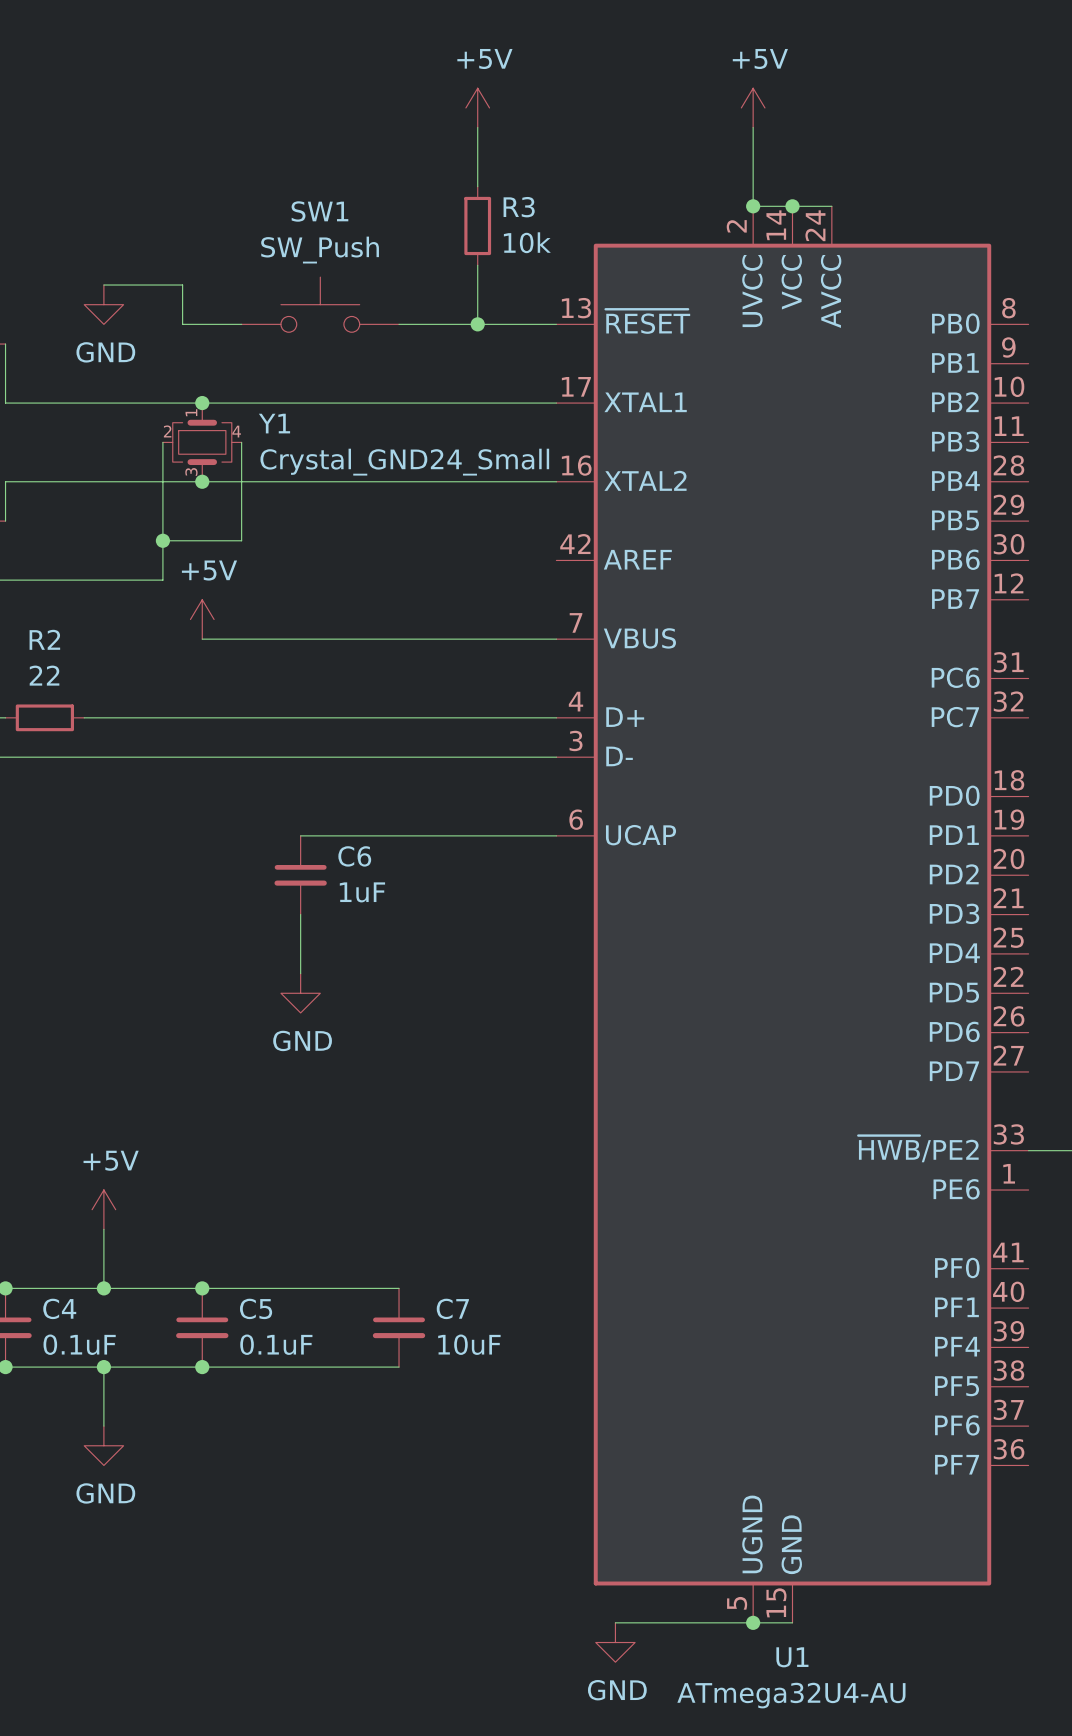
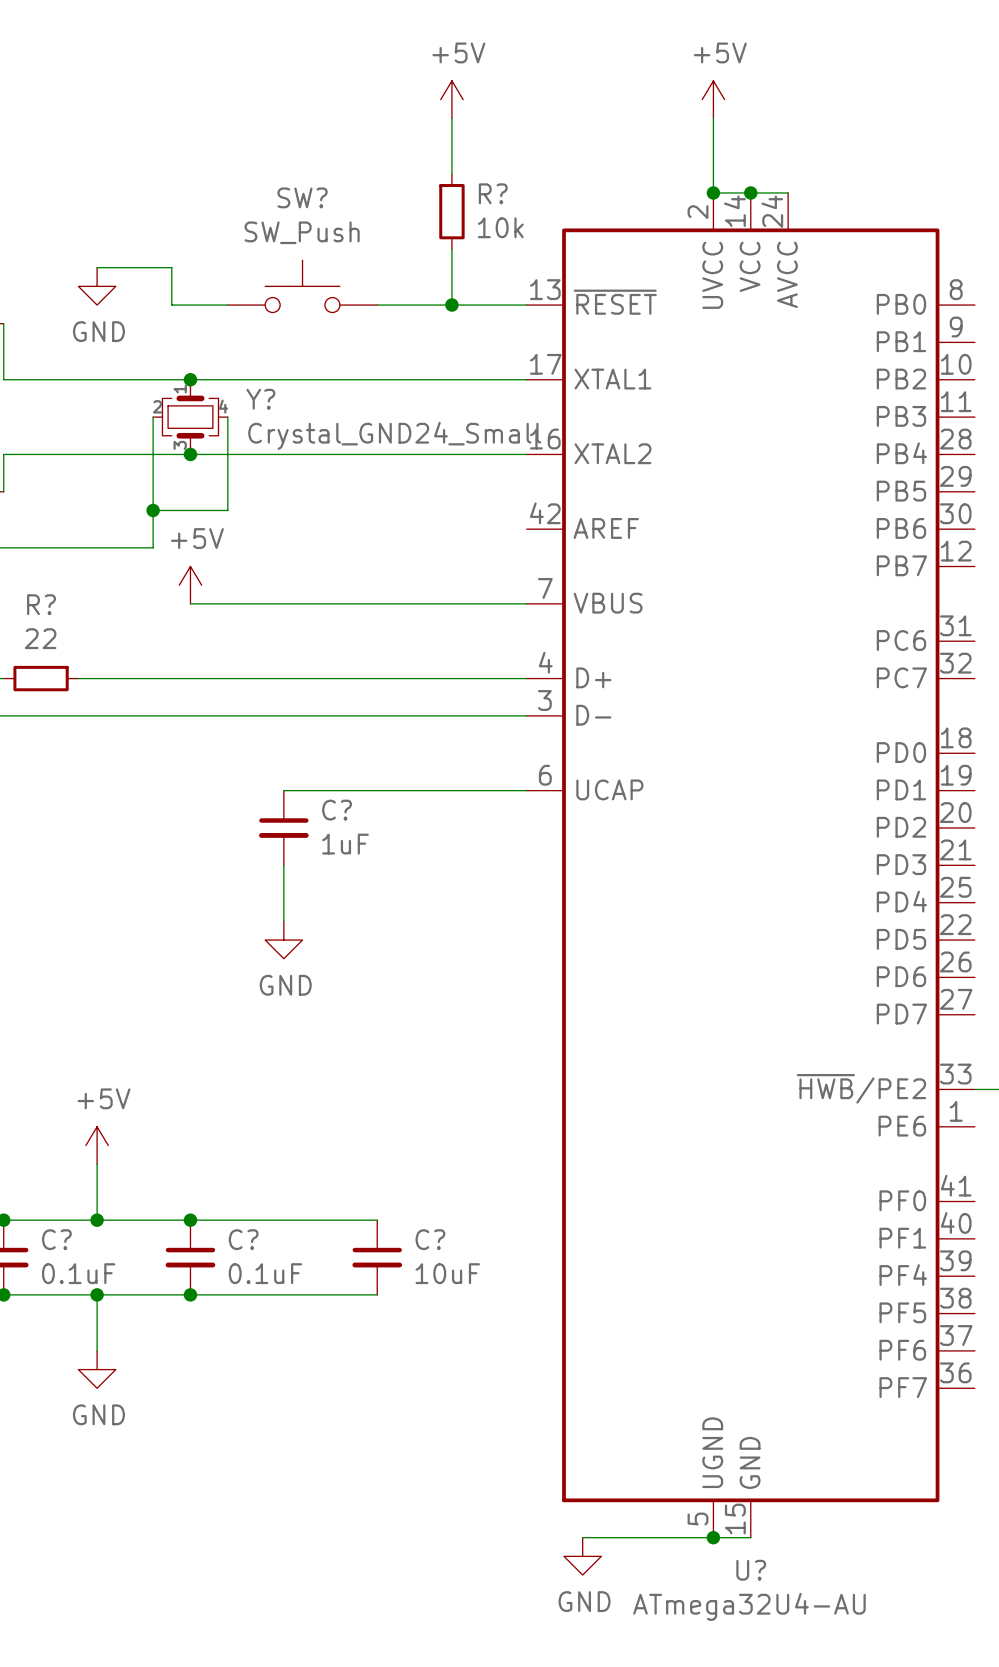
R3 name: R3 (519, 207) -> R? (493, 193)
SW1 name: SW1 (319, 211) -> SW? (302, 197)
Y1 name: Y1 (274, 423) -> Y? (260, 399)
R2 name: R2 (44, 639) -> R? (41, 604)
C6 name: C6 (354, 856) -> C? (337, 810)
C4 name: C4 (59, 1308) -> C? (56, 1239)
C5 name: C5 (256, 1308) -> C? (243, 1239)
C7 name: C7 (452, 1308) -> C? (430, 1239)
U1 name: U1 (792, 1657) -> U? (751, 1570)

